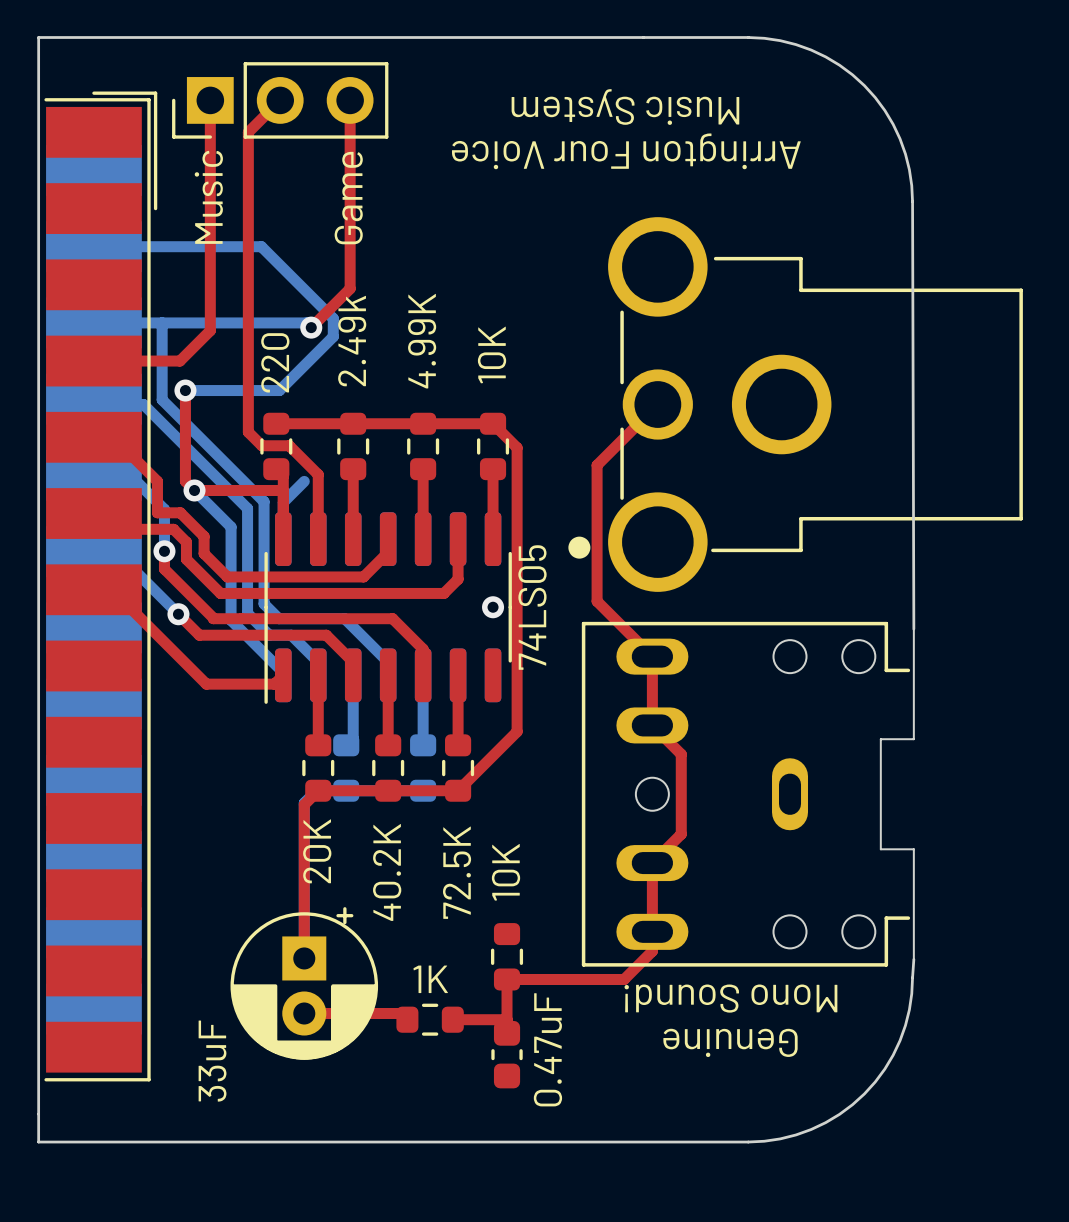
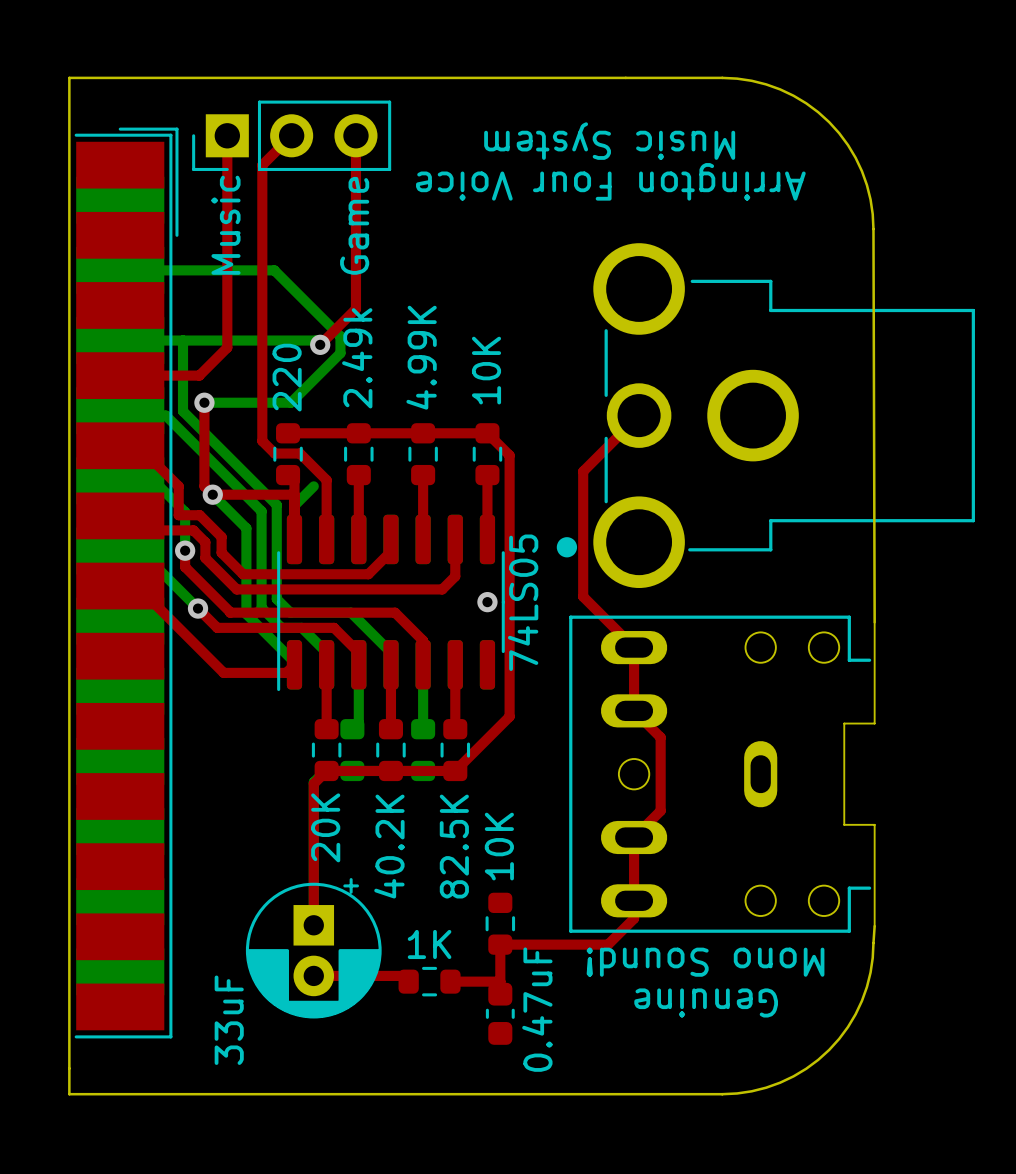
part value: 72.5K (457, 872) -> 82.5K (454, 846)

